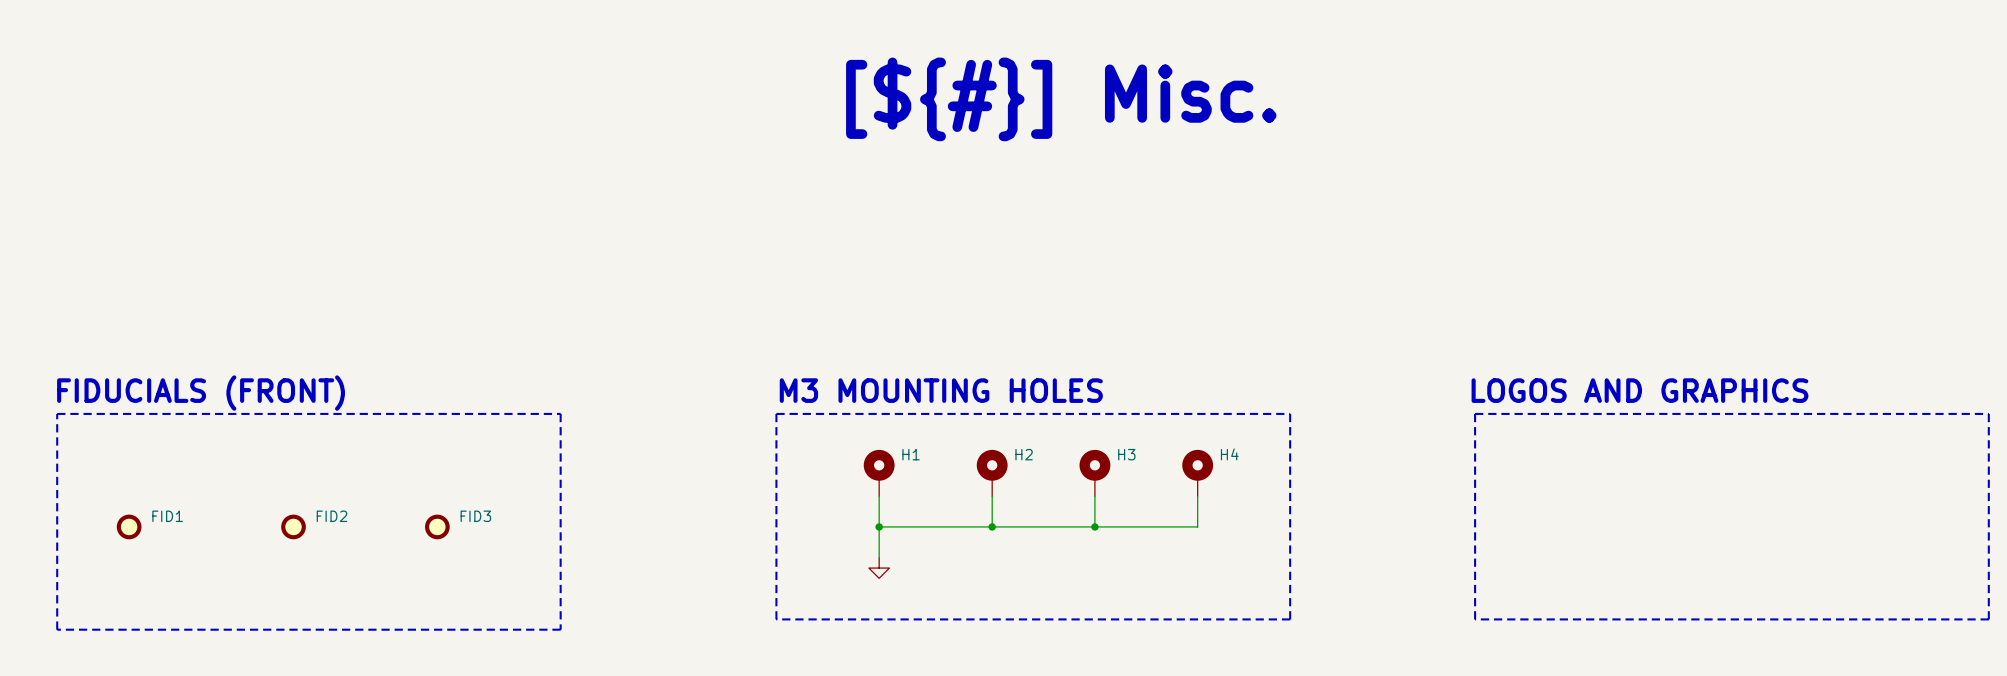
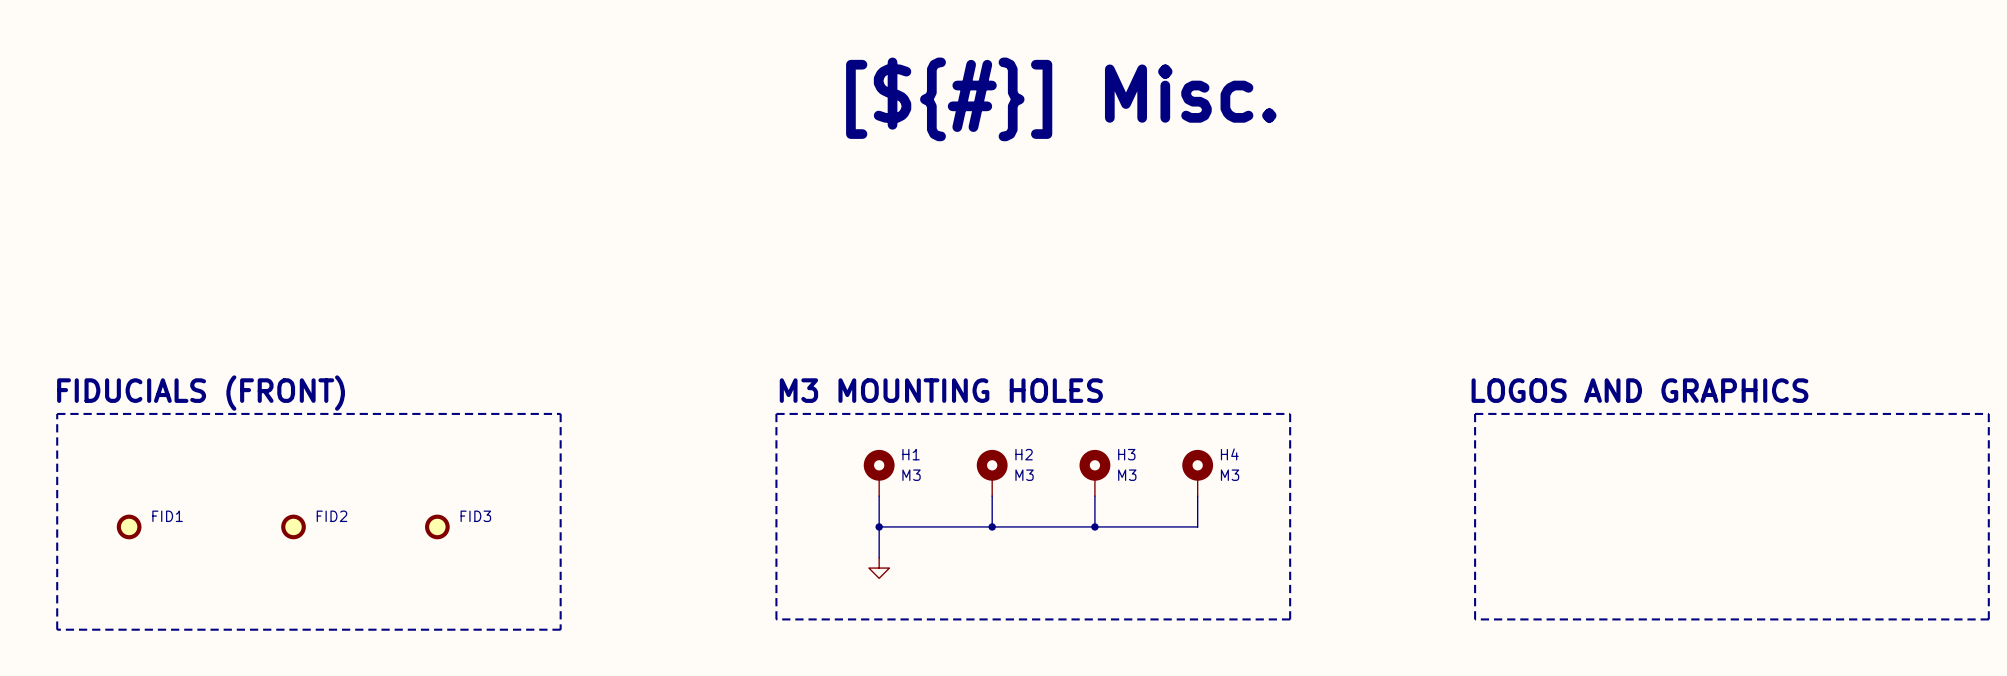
H1 value: none -> M3 (911, 475)
H2 value: none -> M3 (1024, 475)
H3 value: none -> M3 (1127, 475)
H4 value: none -> M3 (1230, 475)

